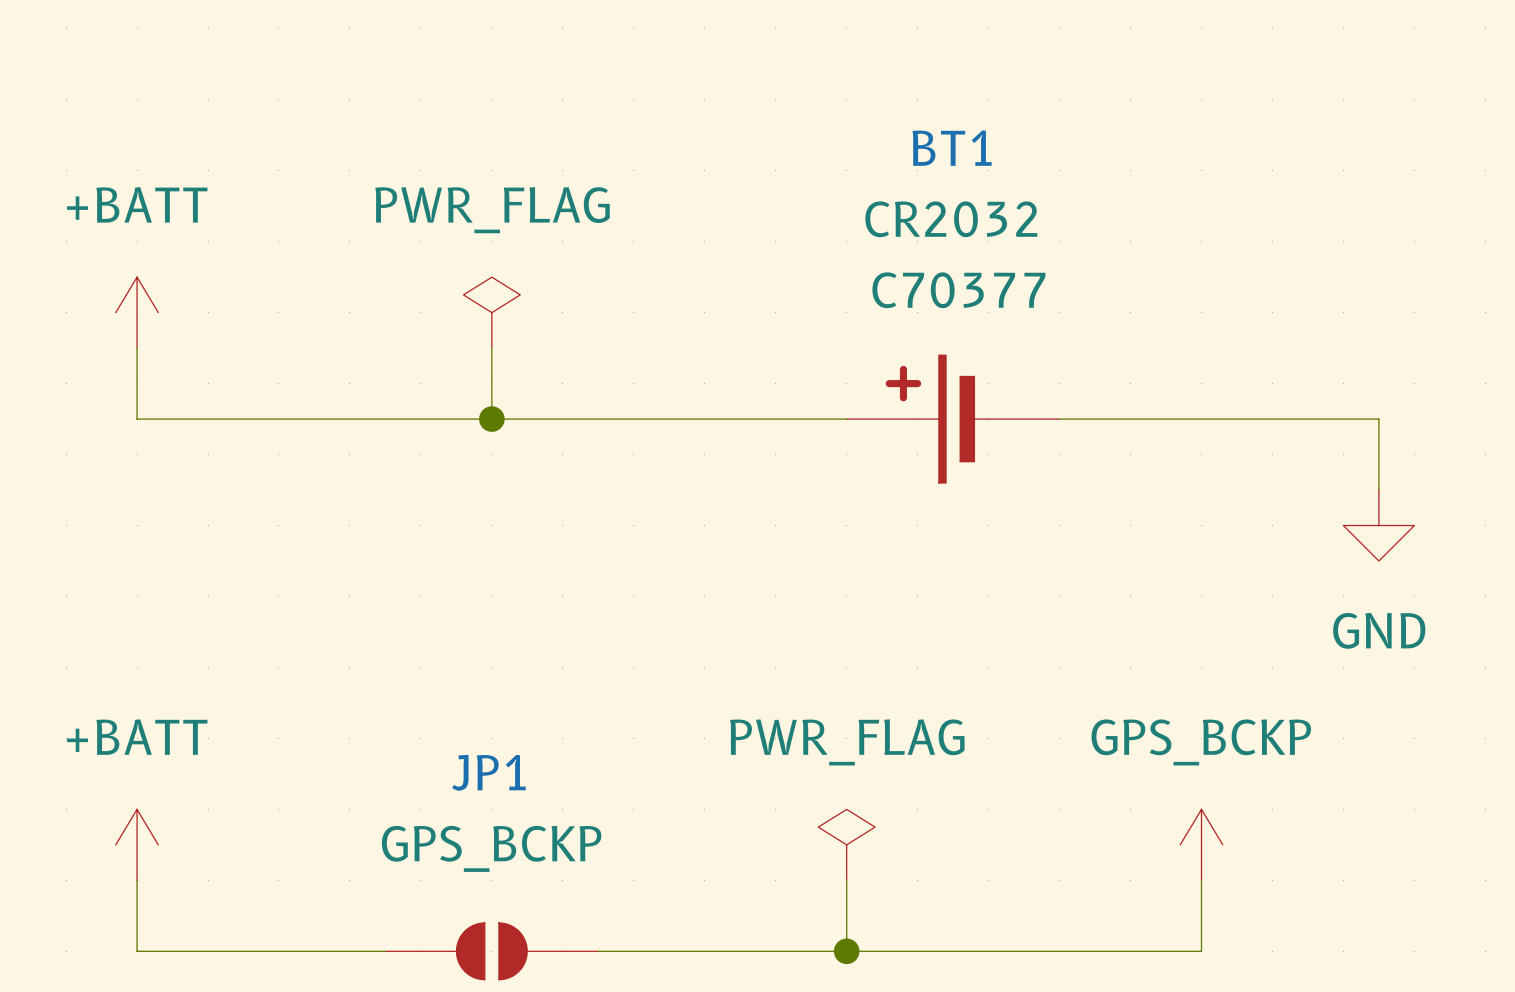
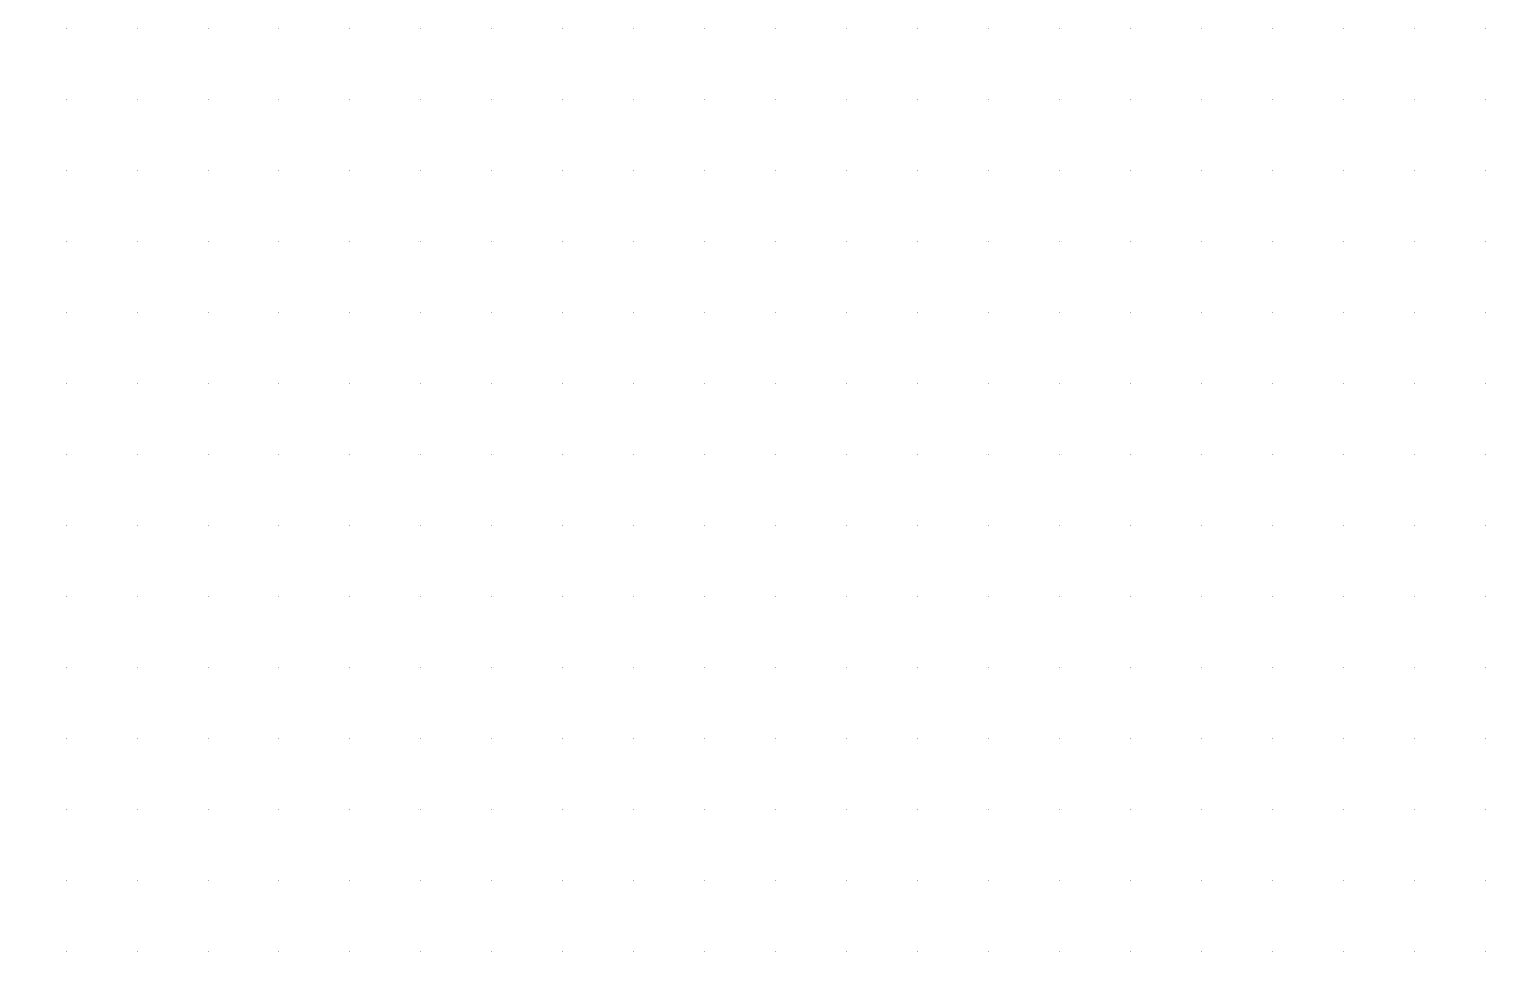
power symbol: +BATT (137, 312) -> none
power symbol: PWR_FLAG (491, 312) -> none
wire: (137, 348) (137, 419) (846, 419) -> none
wire: (491, 348) (491, 419) -> none
junction: (491, 419) -> none
BT1: CR2032 (953, 419) -> none
wire: (1059, 419) (1378, 419) (1378, 490) -> none
power symbol: GND (1378, 525) -> none
power symbol: +BATT (137, 844) -> none
power symbol: PWR_FLAG (846, 844) -> none
power symbol: GPS_BCKP (1201, 844) -> none
wire: (137, 880) (137, 951) (385, 951) -> none
wire: (846, 880) (846, 951) -> none
wire: (1201, 880) (1201, 951) (598, 951) -> none
JP1: GPS_BCKP (491, 951) -> none
junction: (846, 951) -> none

